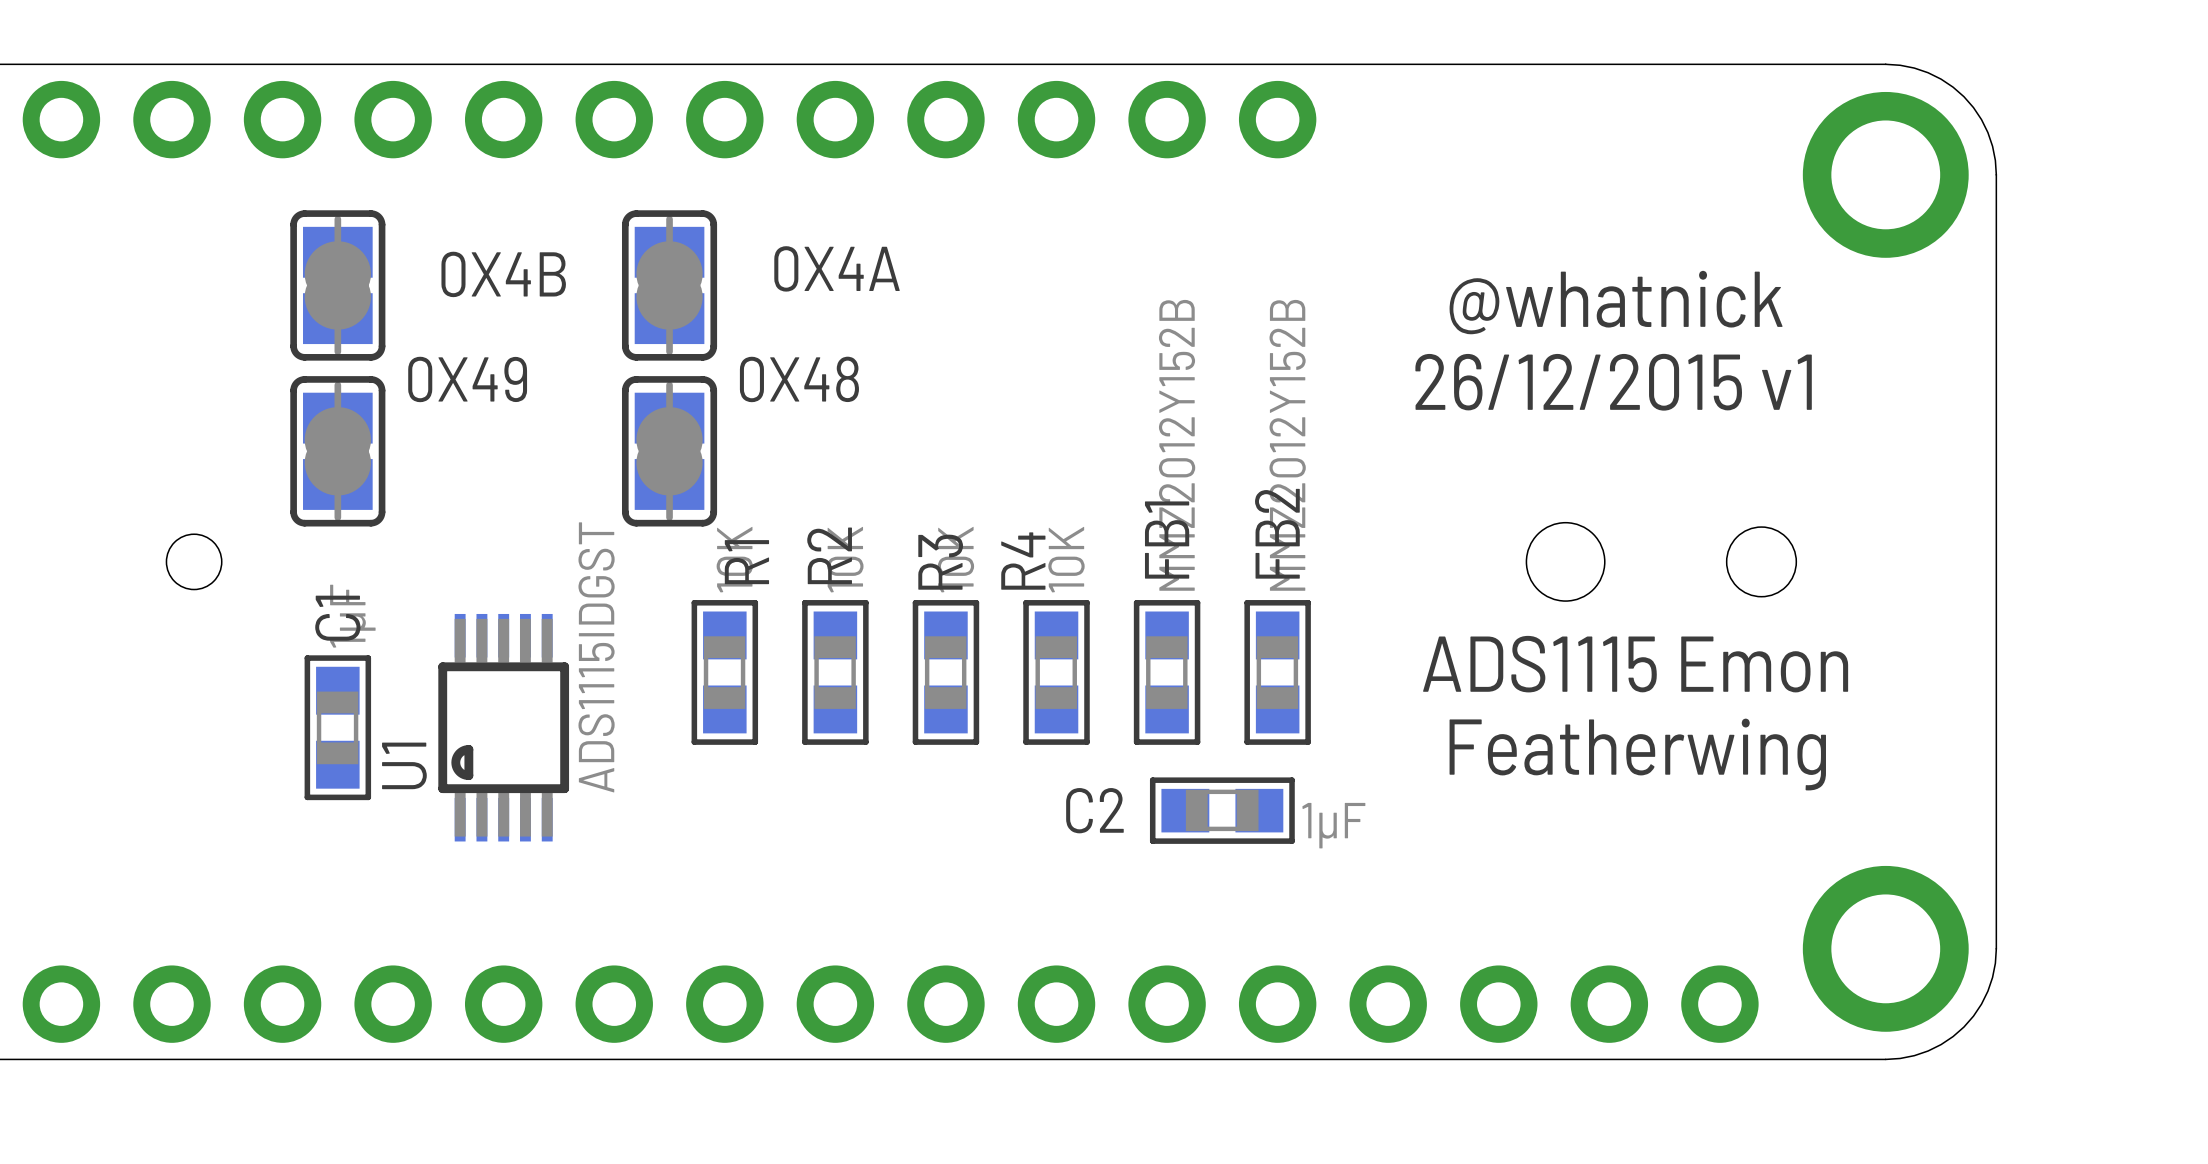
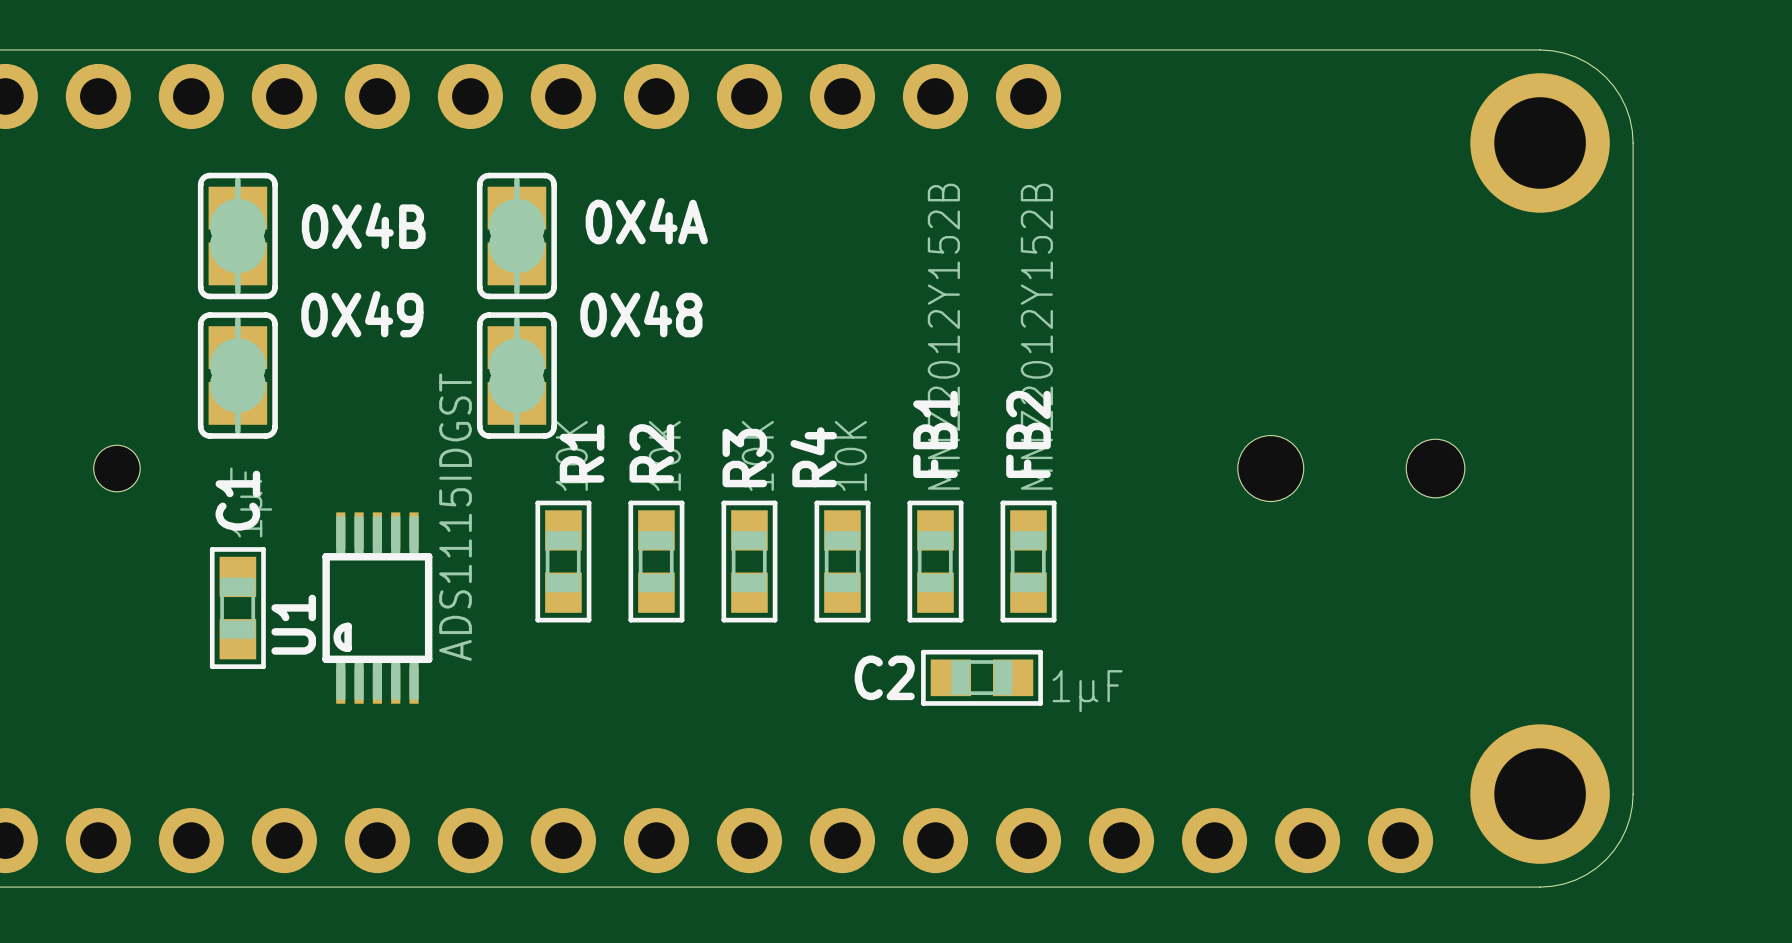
text: @whatnick (1616, 302) -> none
text: 26/12/2015 v1 (1613, 382) -> none
text: ADS1115 Emon (1635, 664) -> none
text: Featherwing (1637, 754) -> none

